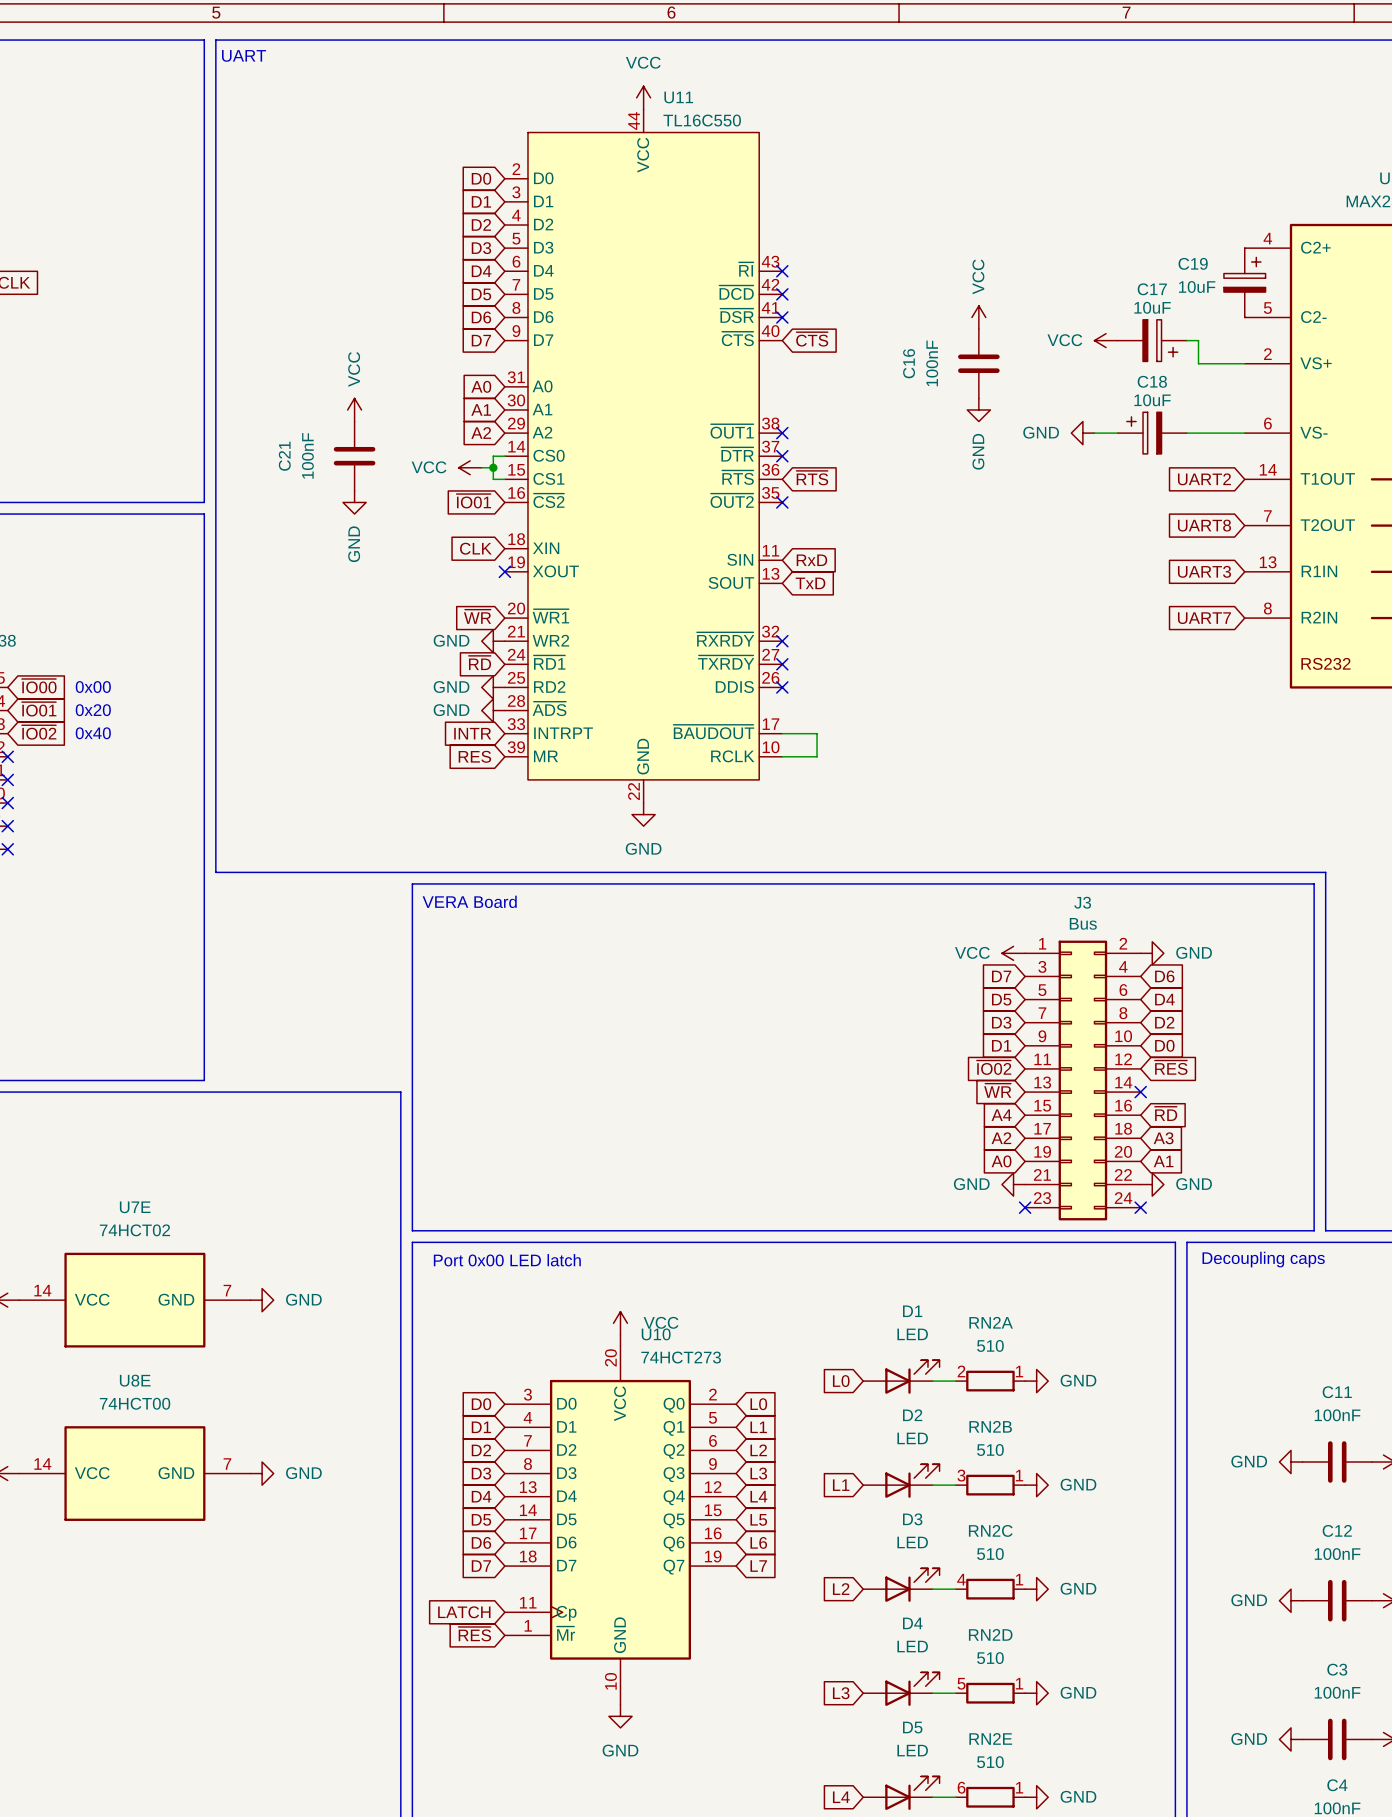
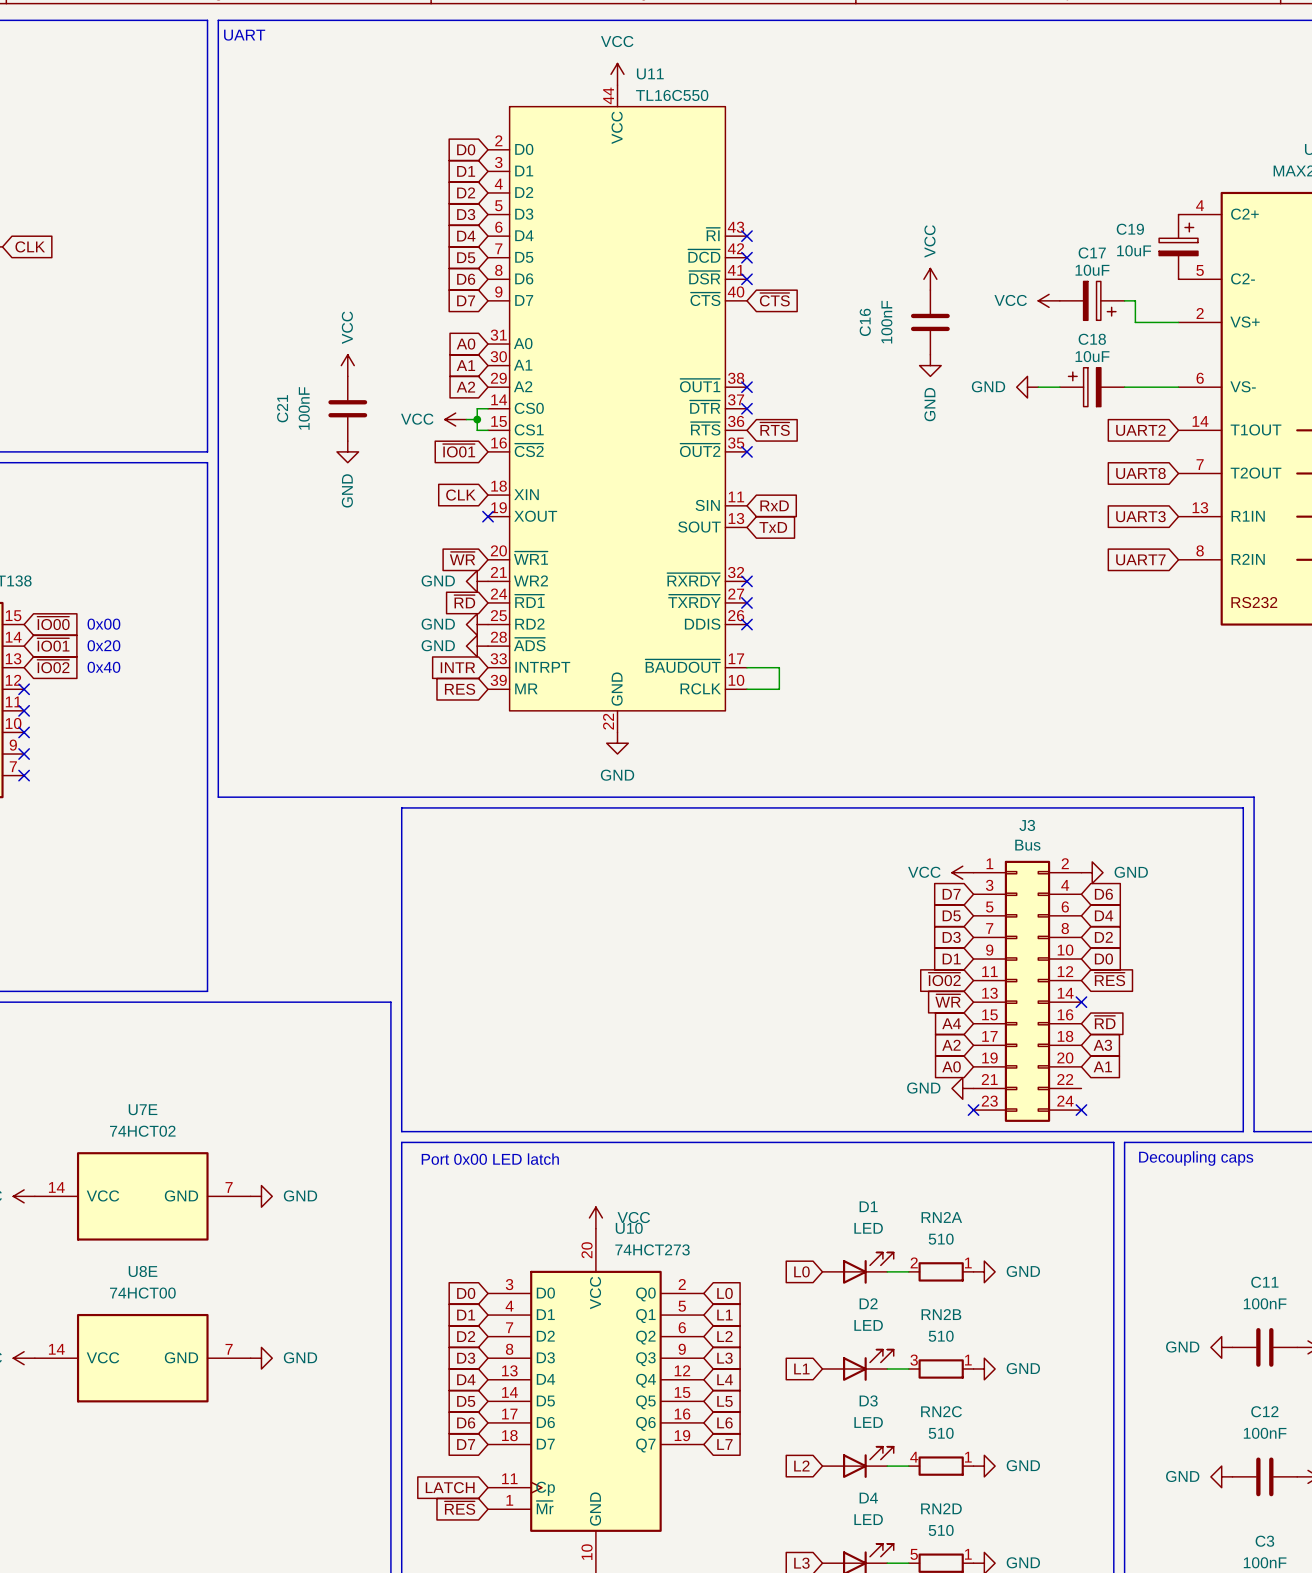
text: VERA Board (469, 901) -> none
power symbol: GND (1152, 1184) -> none

